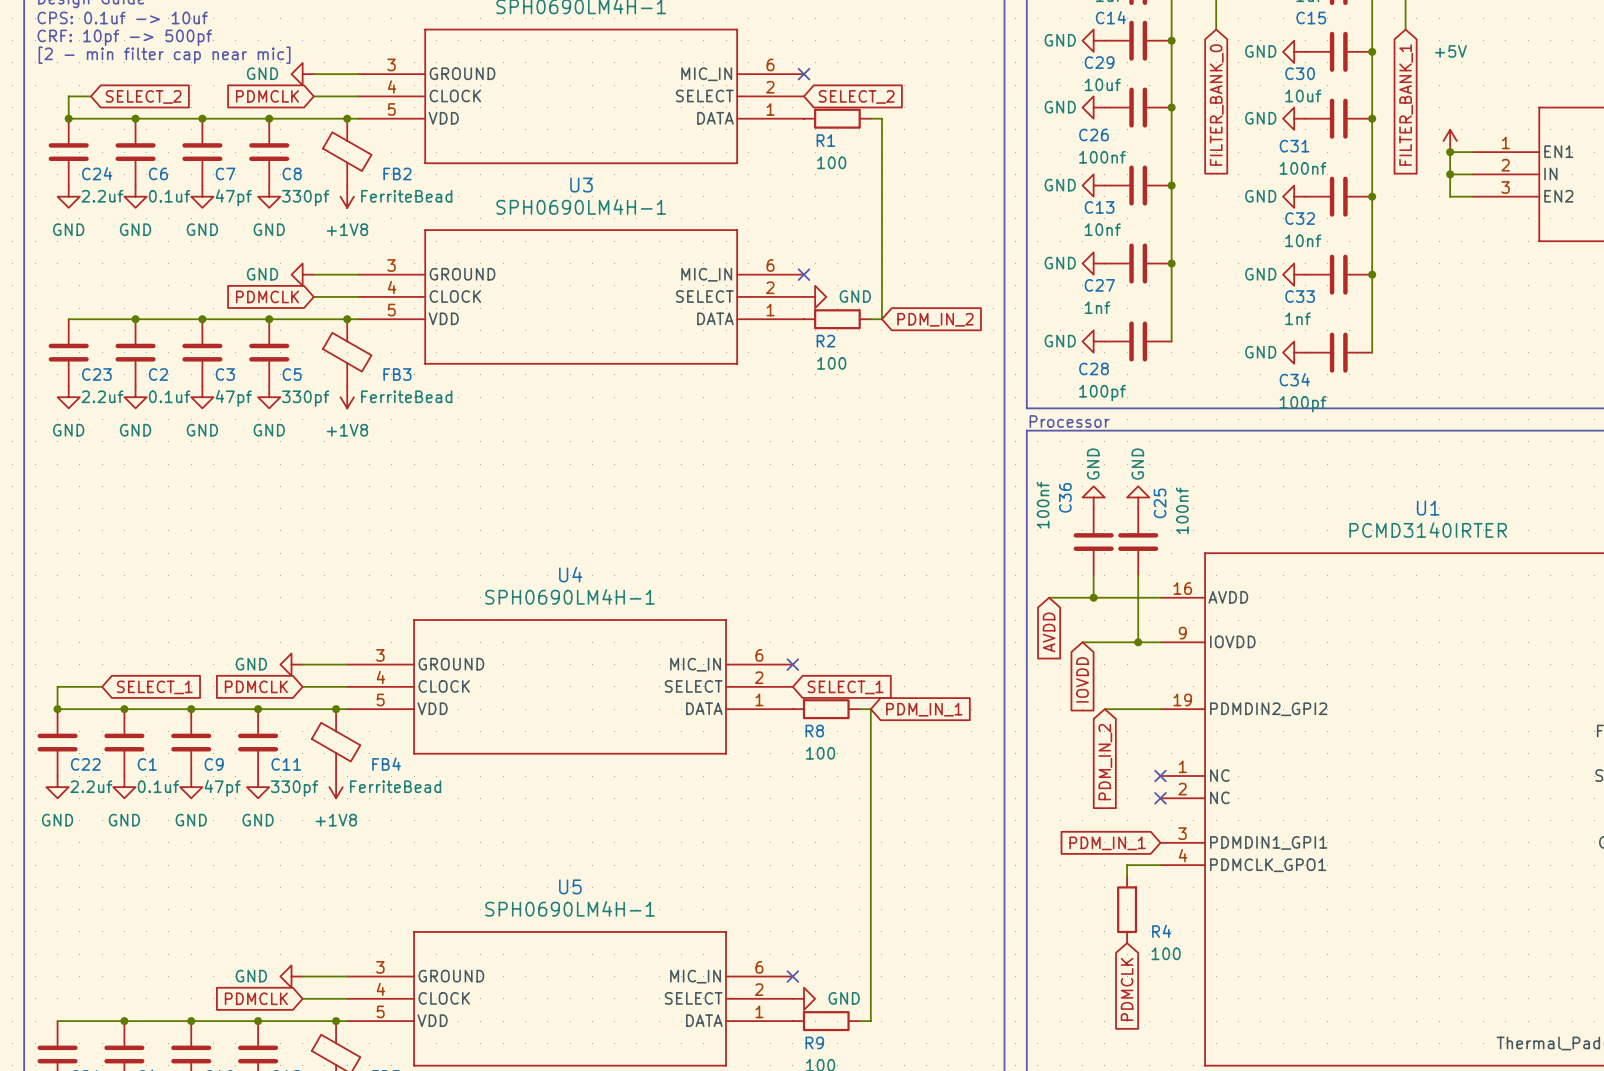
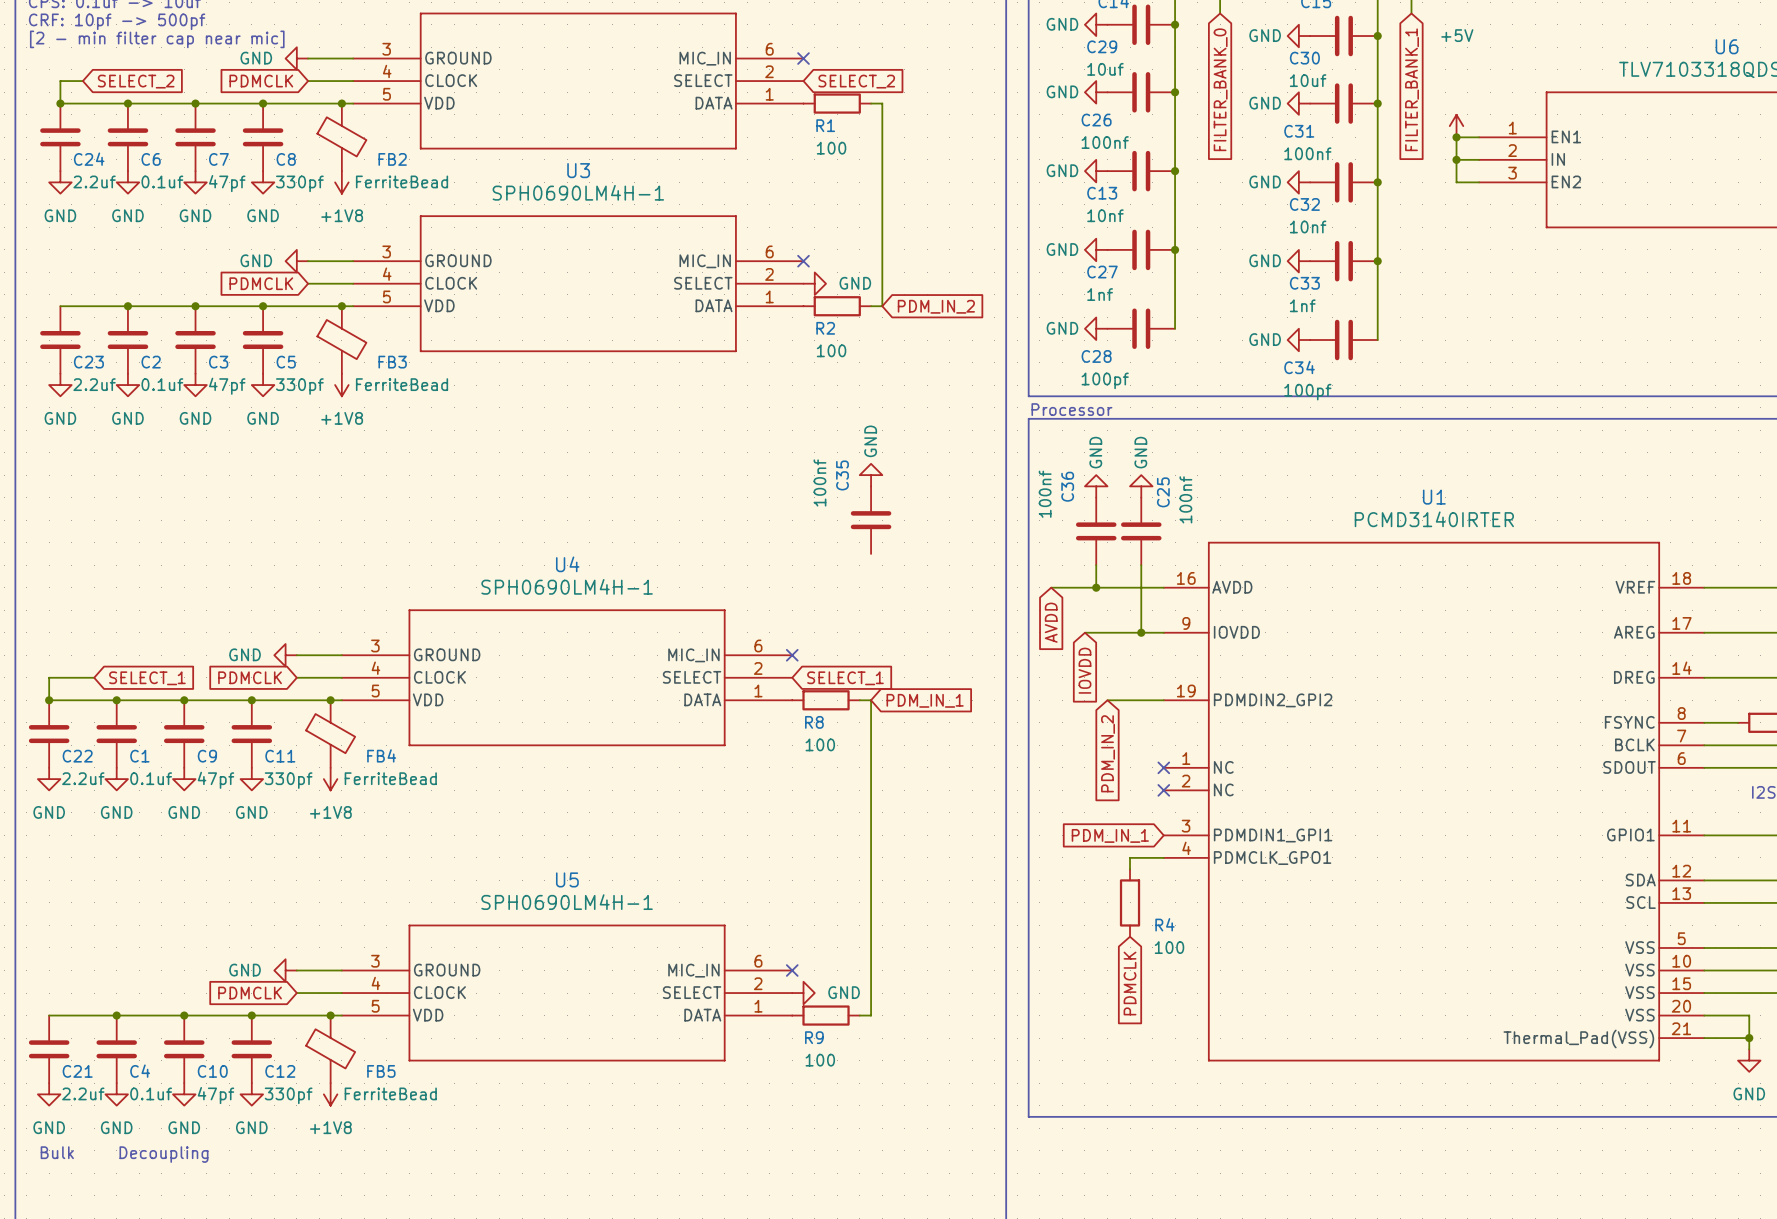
power symbol: none -> GND (871, 475)
C35: none -> 100nf (871, 520)

